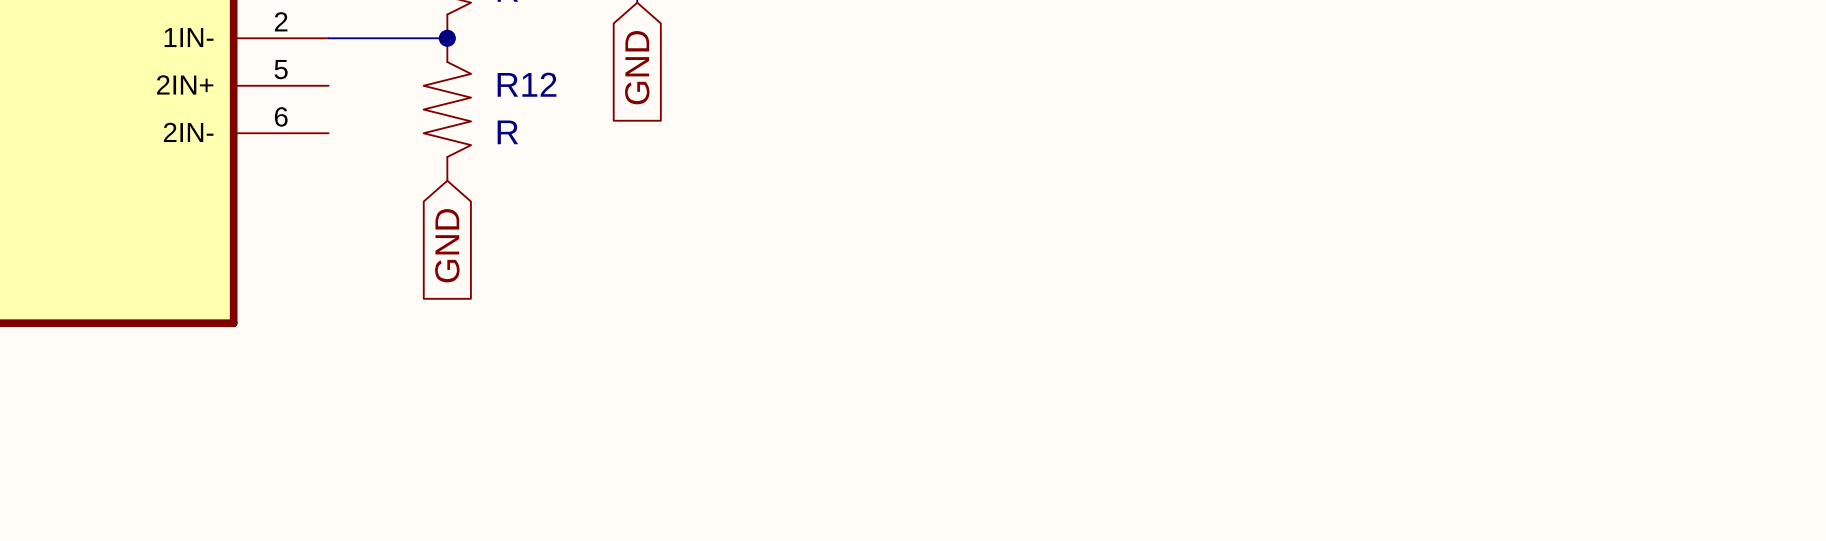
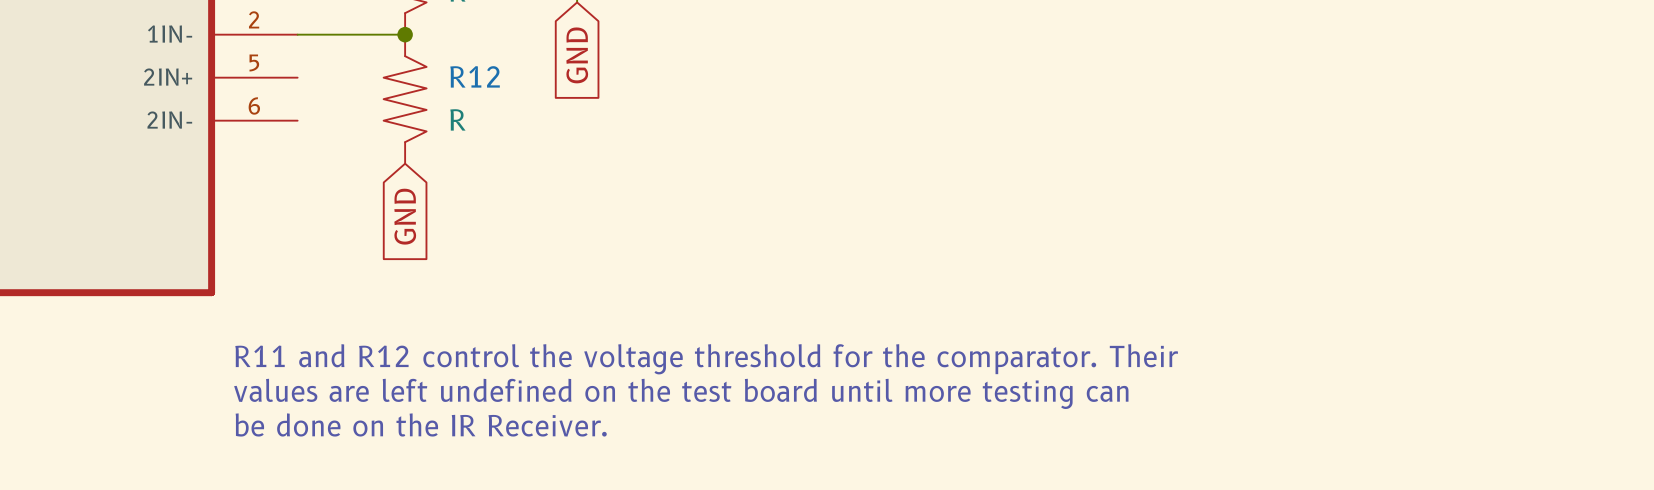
text: none -> R11 and R12 control the voltage threshold for the comparator. Their (706, 359)
text: none -> values are left undefined on the test board until more testing can (681, 393)
text: none -> be done on the IR Receiver. (421, 424)

